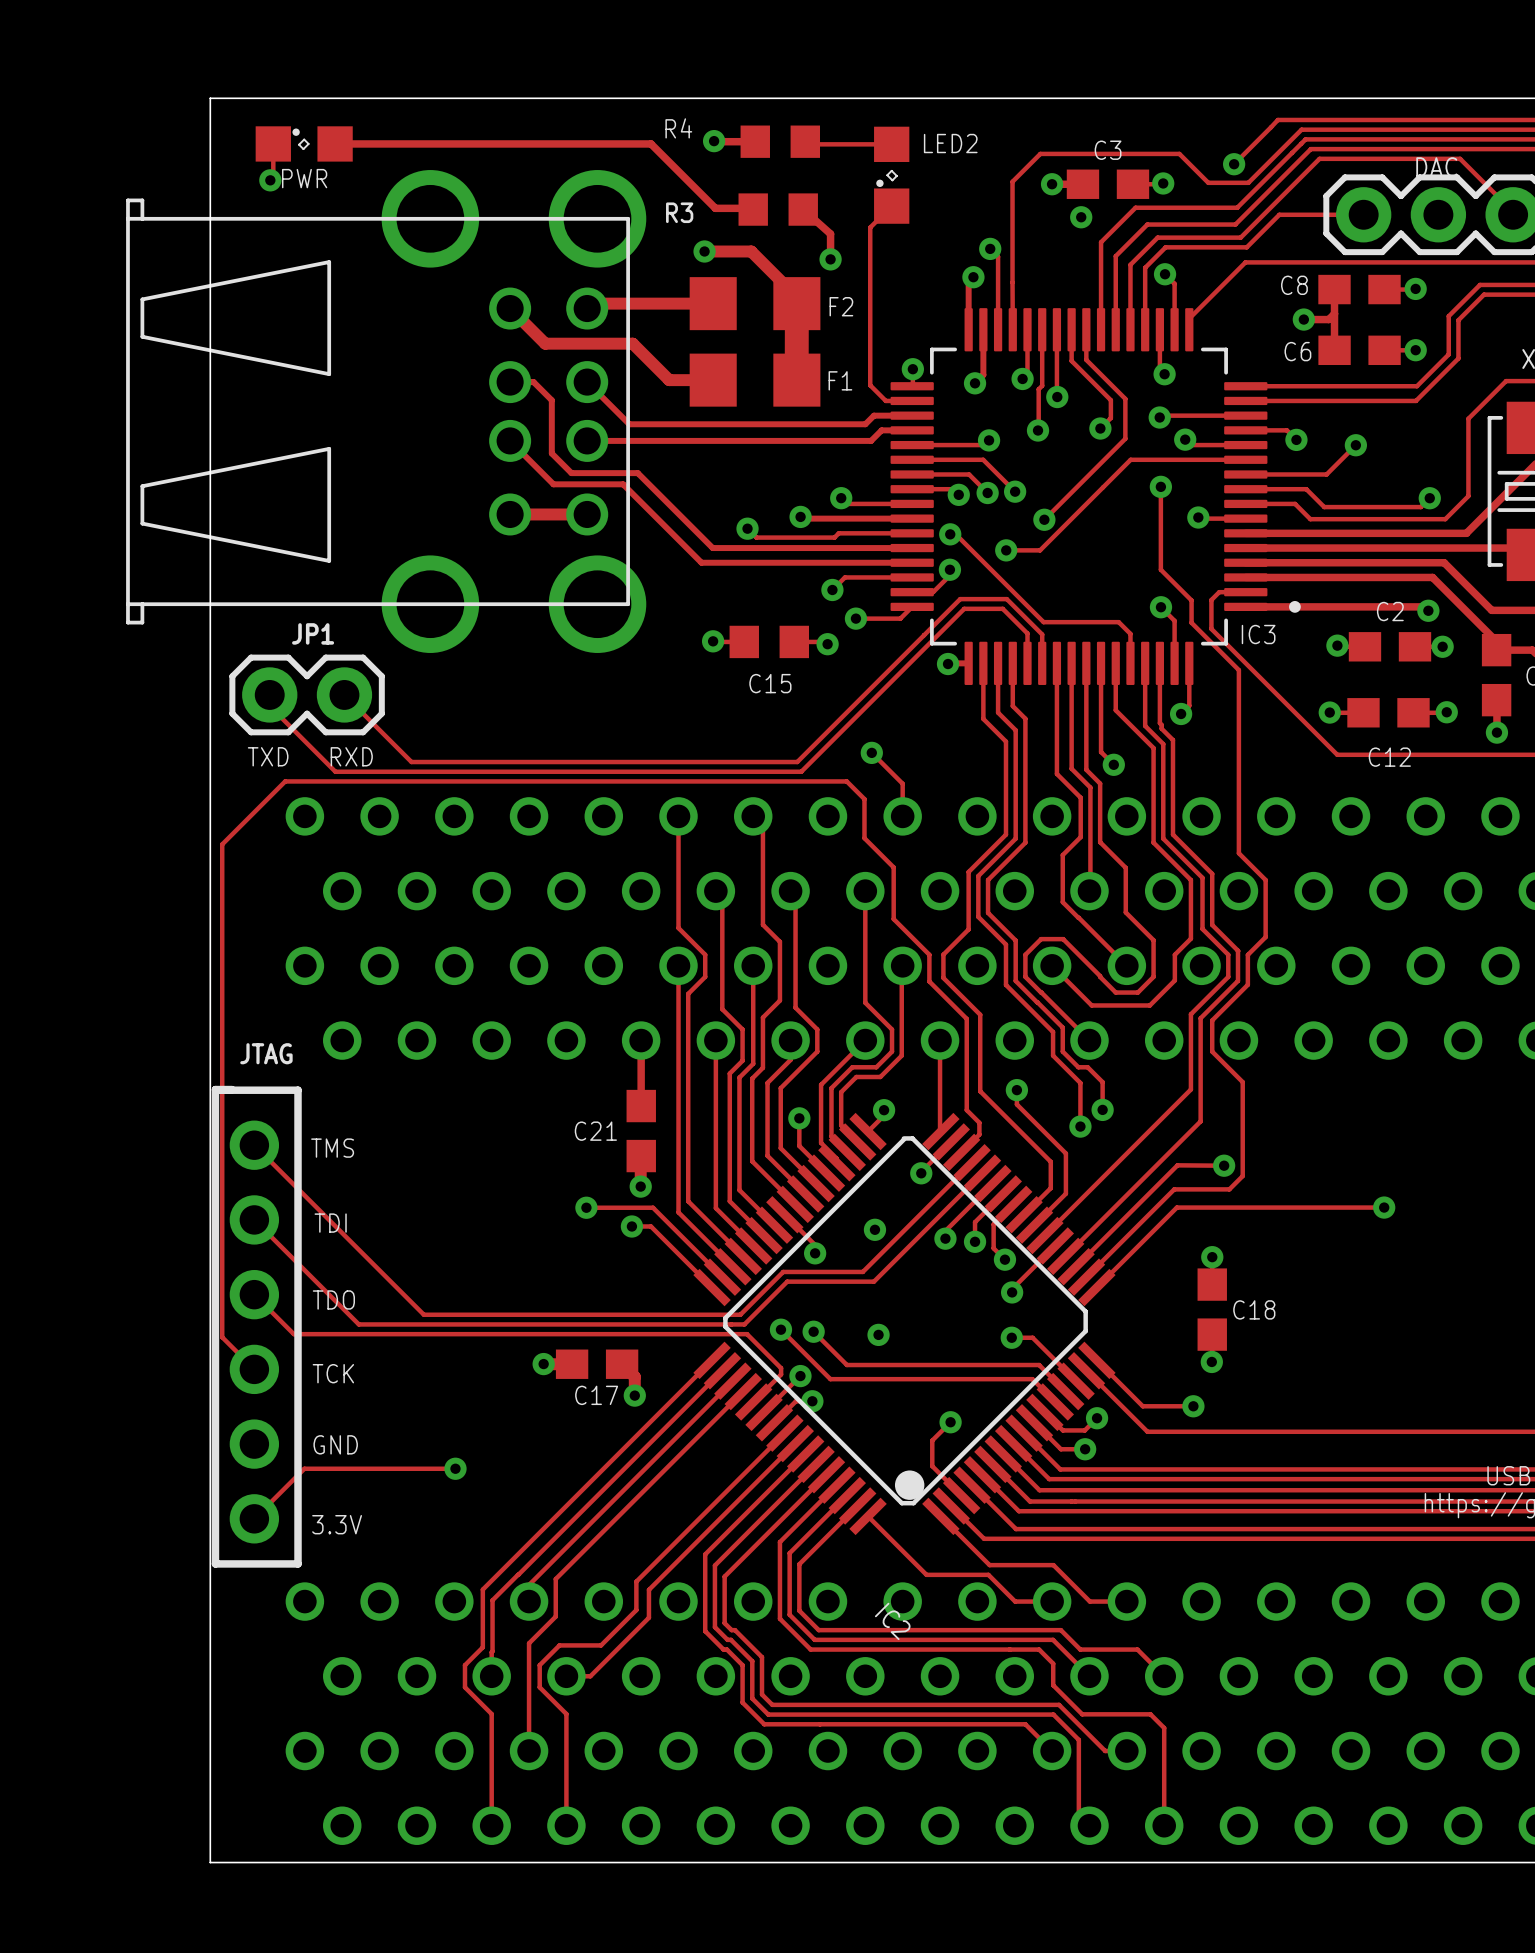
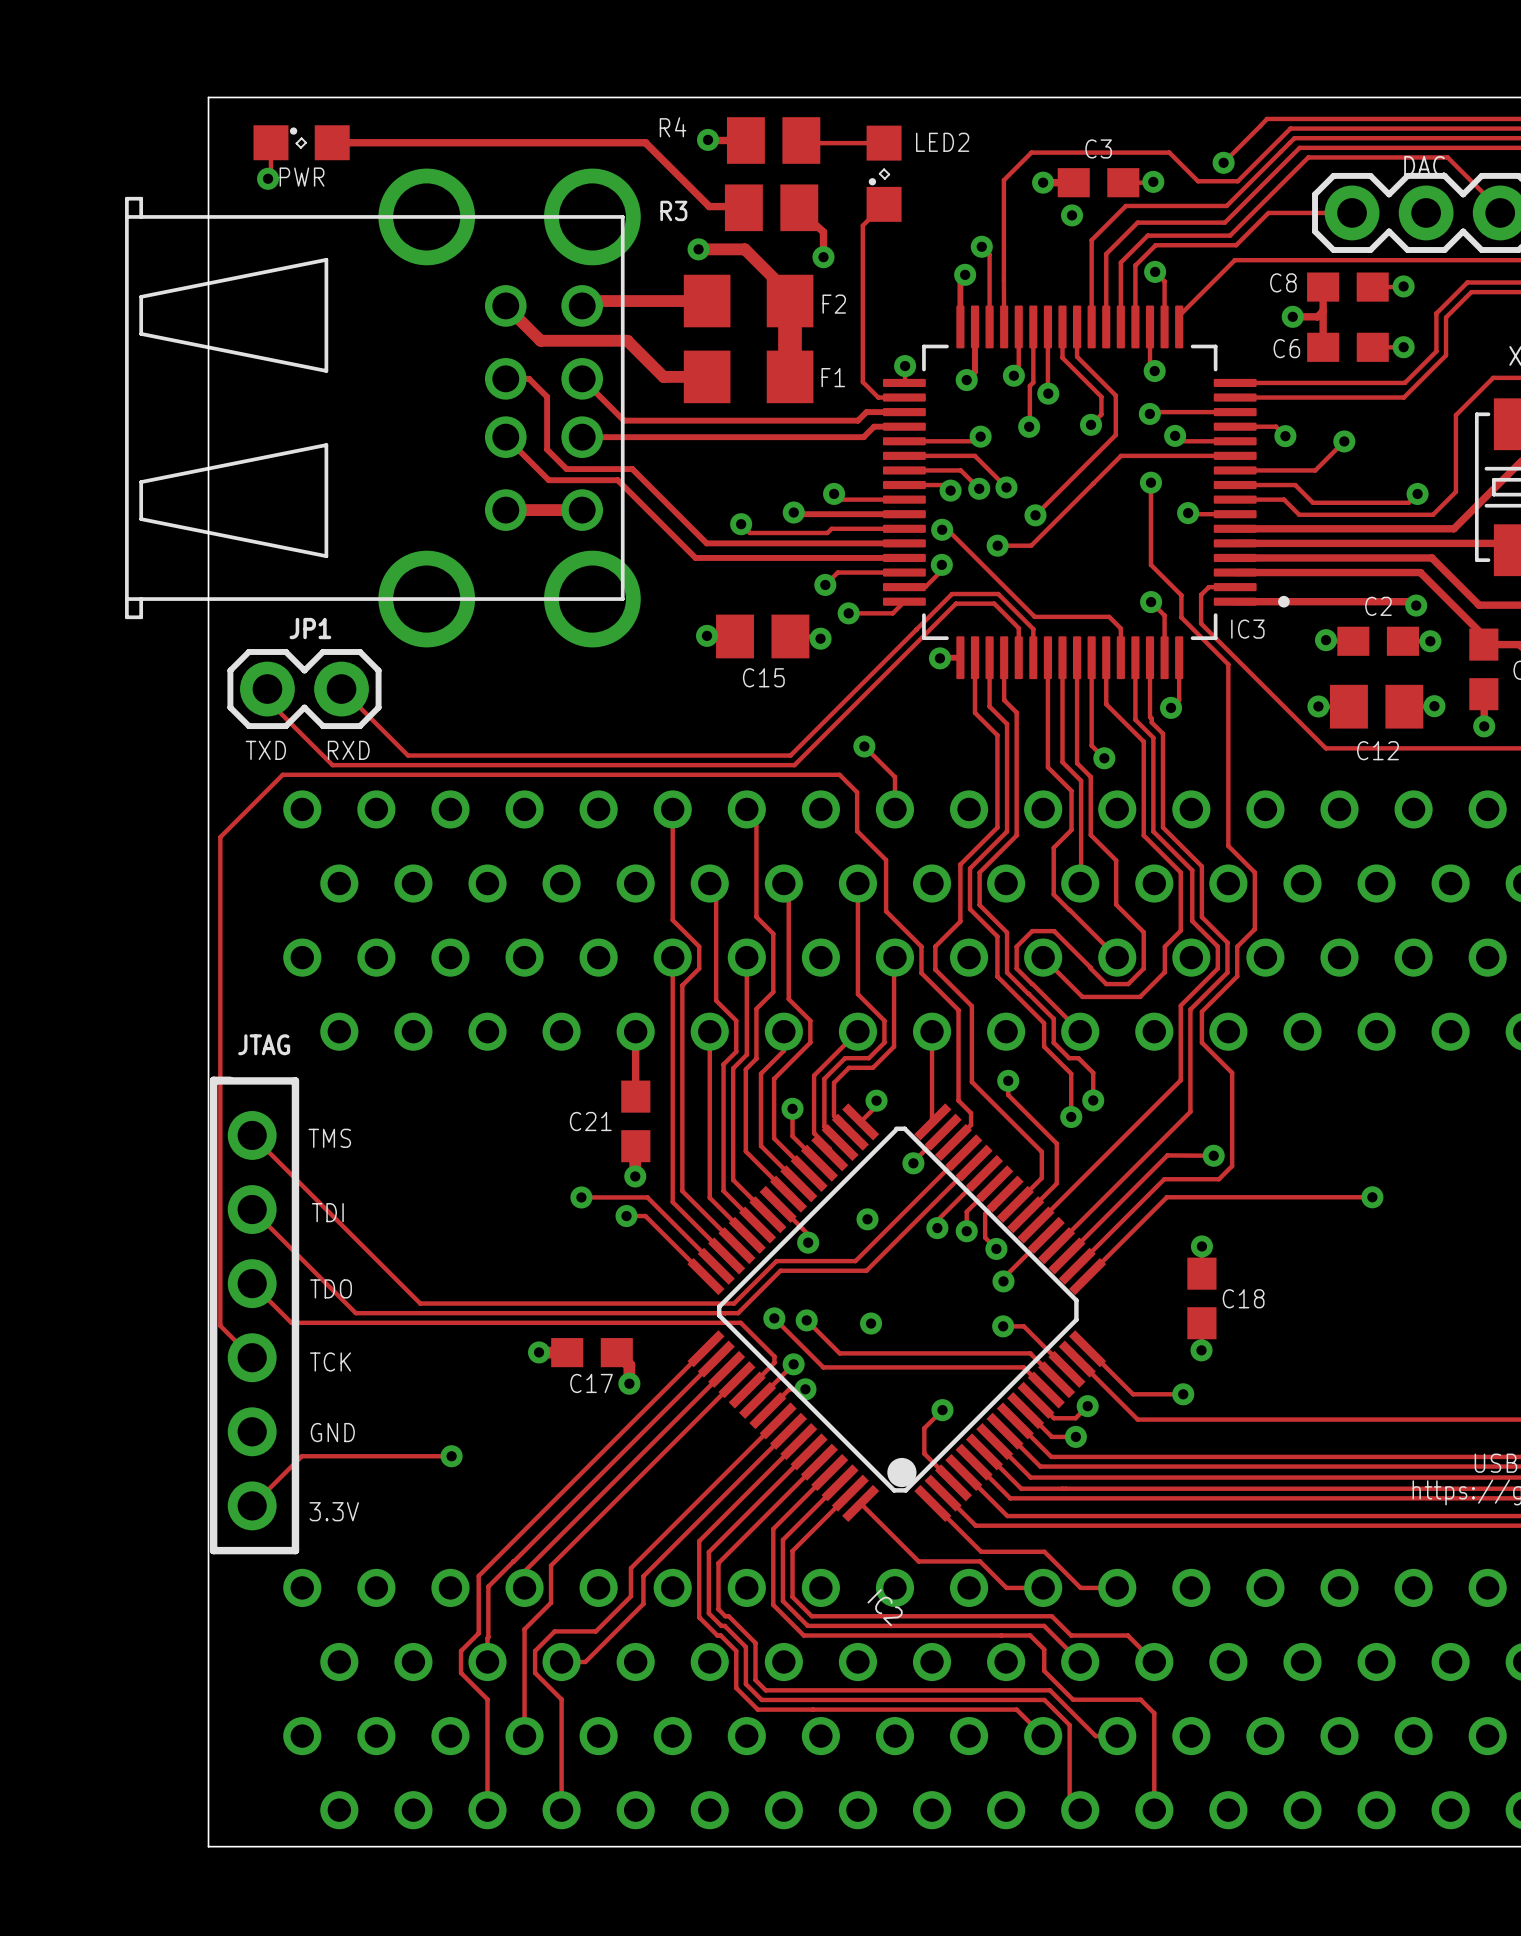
R4 footprint: [740, 125, 821, 158] -> [726, 117, 821, 164]
R3 footprint: [738, 193, 818, 226] -> [724, 184, 819, 232]
C15 footprint: [729, 625, 809, 659] -> [716, 614, 810, 659]
C12 footprint: [1347, 698, 1430, 728] -> [1329, 684, 1424, 729]

